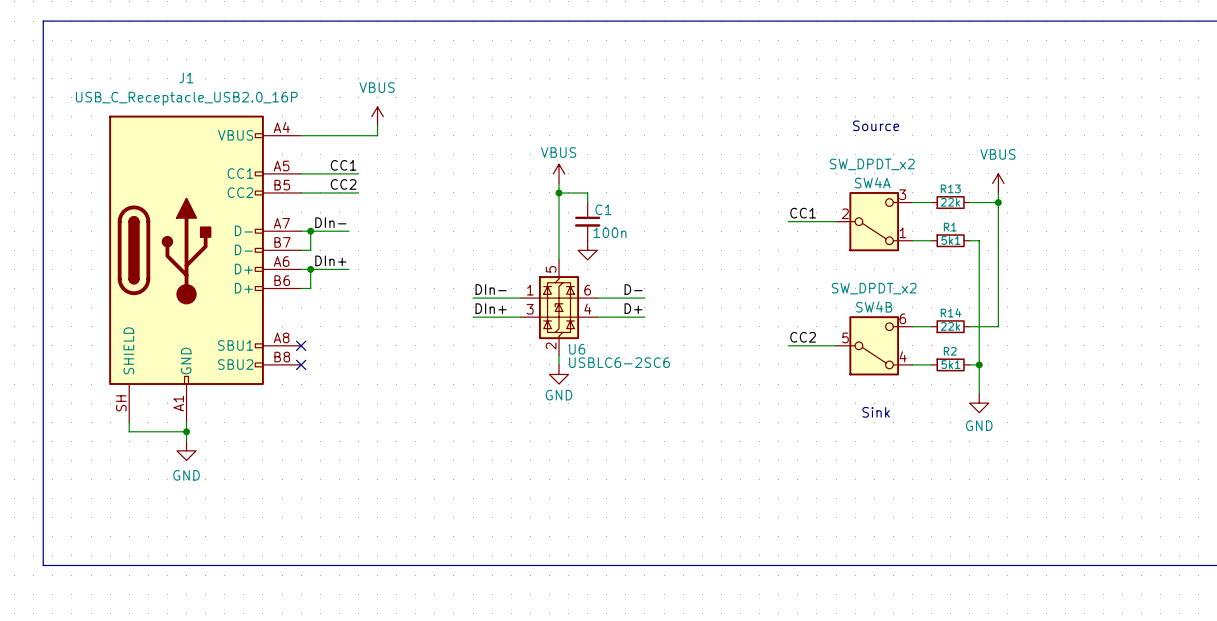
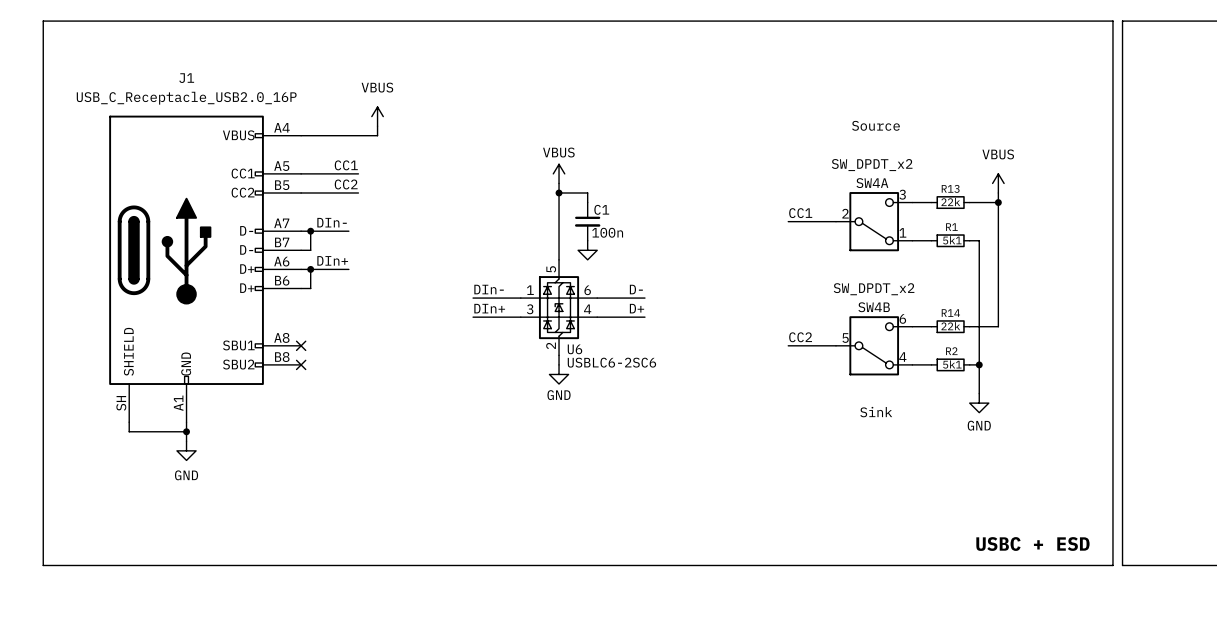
line: (1112, 21) (1122, 21) -> (1112, 21) (1112, 565)
text: none -> USBC + ESD (1032, 544)
line: (1112, 565) (1122, 565) -> (1122, 21) (1122, 565)

